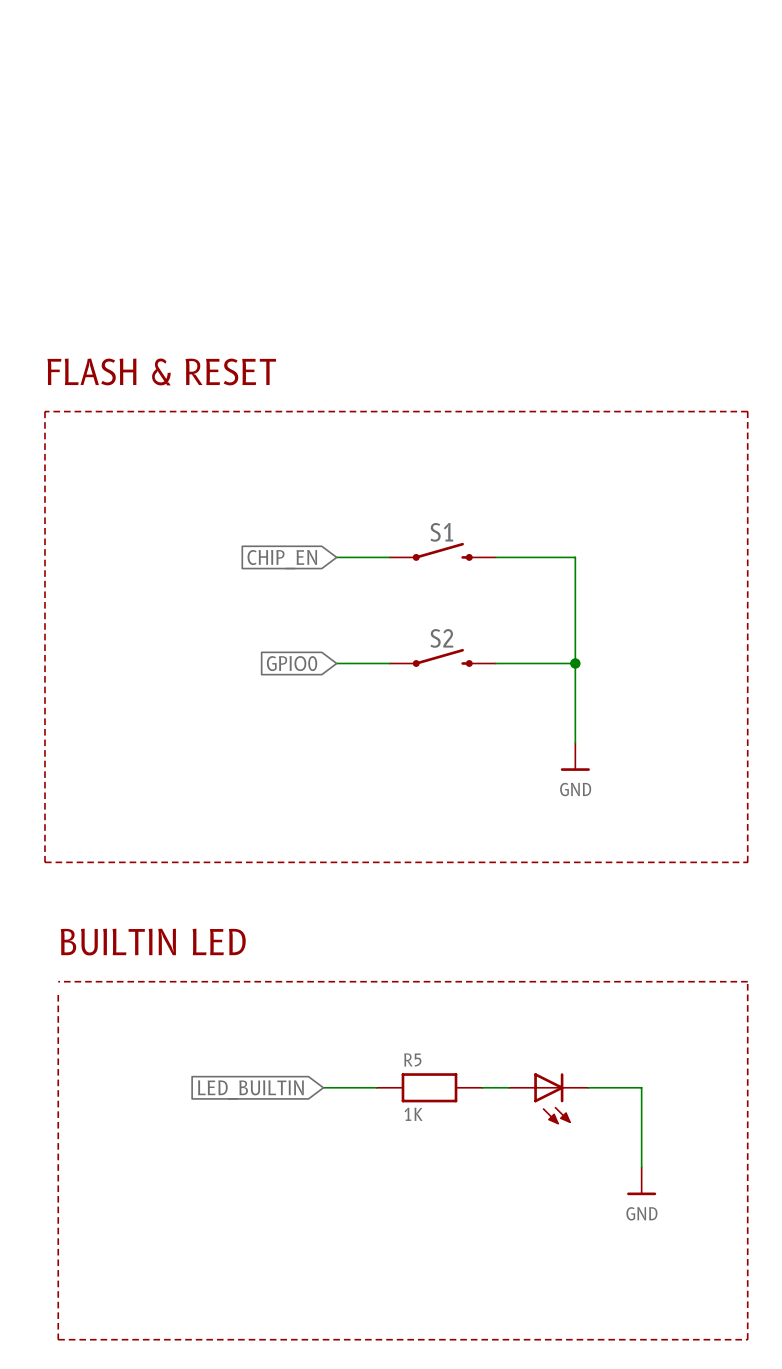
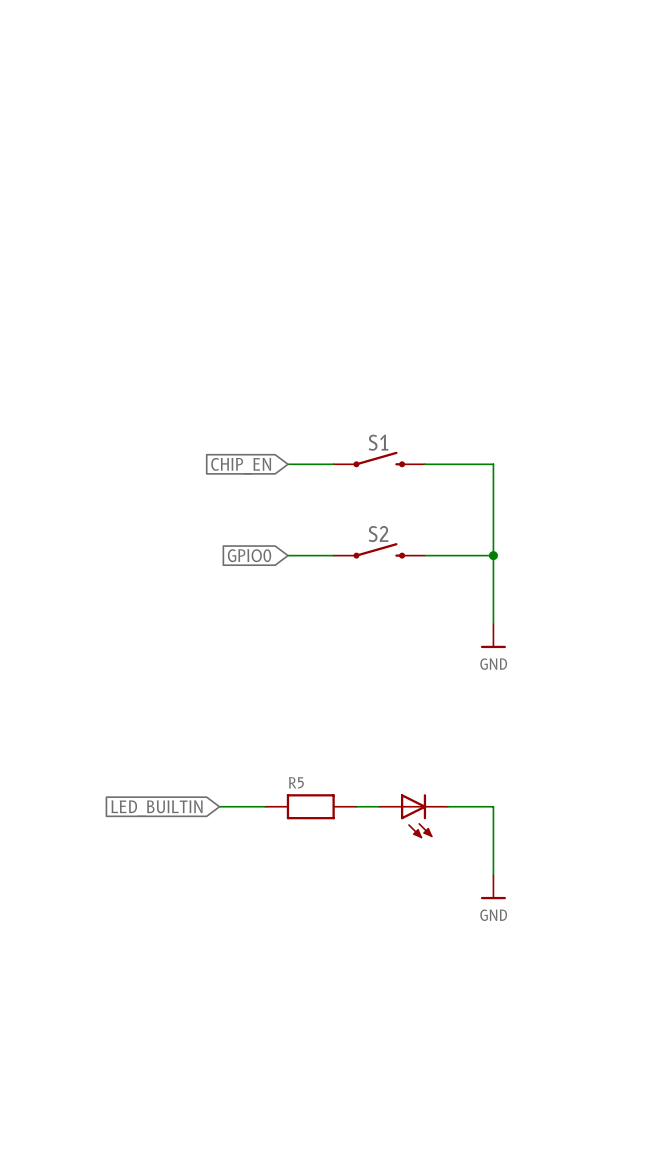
text: FLASH & RESET (161, 371) -> none
line: (44, 411) (44, 862) (747, 862) (747, 411) (44, 411) -> none
text: BUILTIN LED (153, 942) -> none
line: (58, 981) (747, 981) (747, 1339) (58, 1339) (58, 994) -> none
wire: (323, 1087) (376, 1087) -> (219, 806) (265, 806)
R5 position: (429, 1087) -> (310, 806)
wire: (482, 1087) (509, 1087) -> (356, 806) (379, 806)
wire: (588, 1087) (641, 1087) (641, 1167) -> (447, 806) (493, 806) (493, 875)
global label position: LED_BUILTIN (250, 1090) -> LED_BUILTIN (157, 808)
part position: (548, 1098) -> (413, 816)
R5 value: 1K (413, 1114) -> none
power symbol position: GND (641, 1181) -> GND (493, 887)

